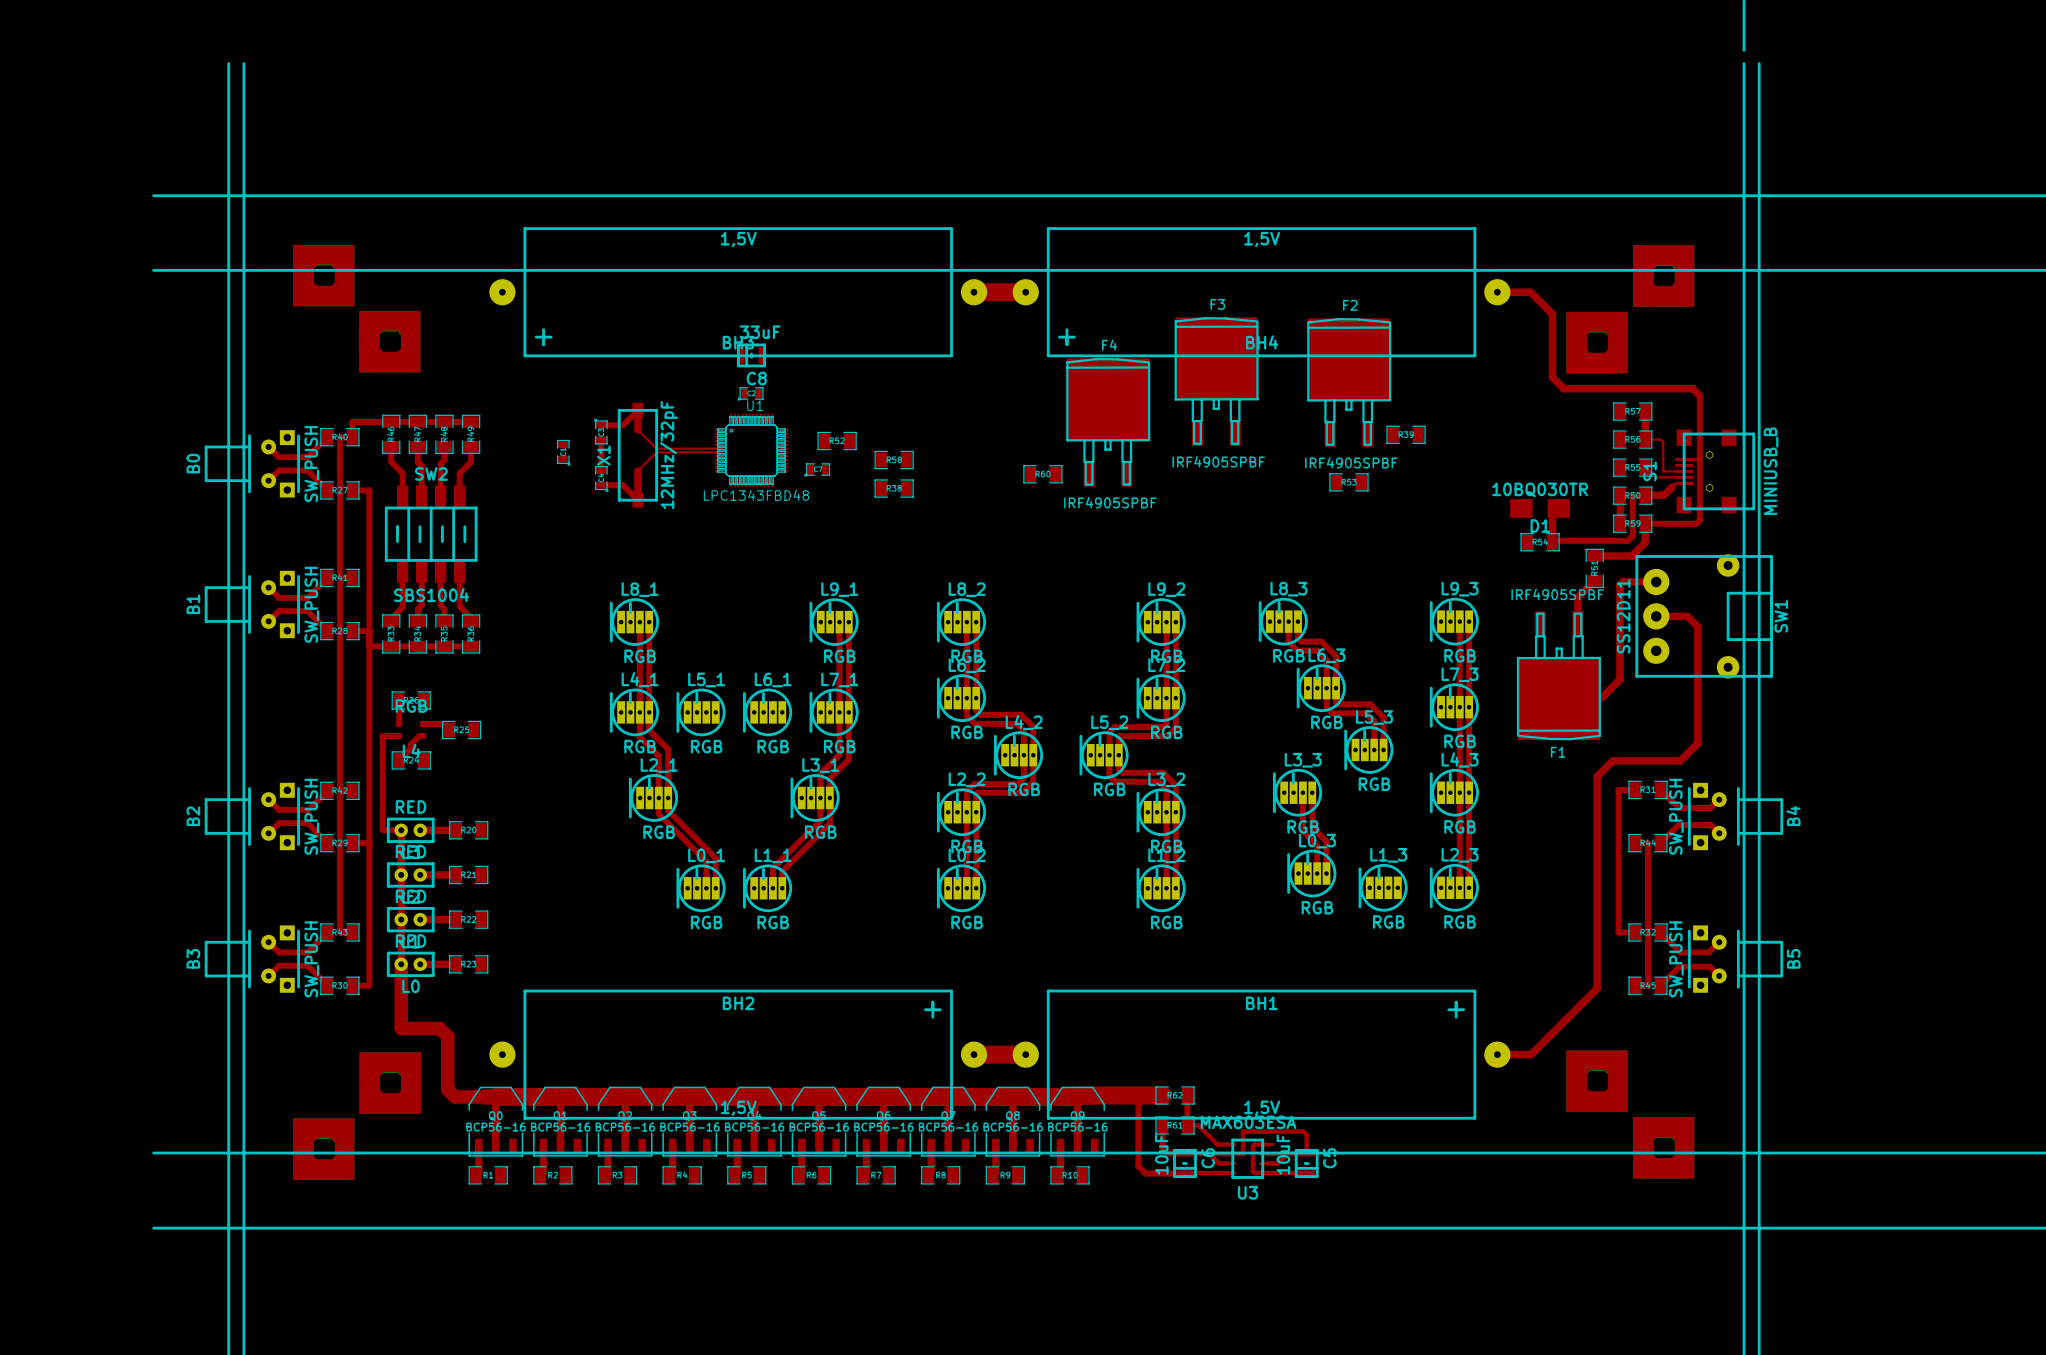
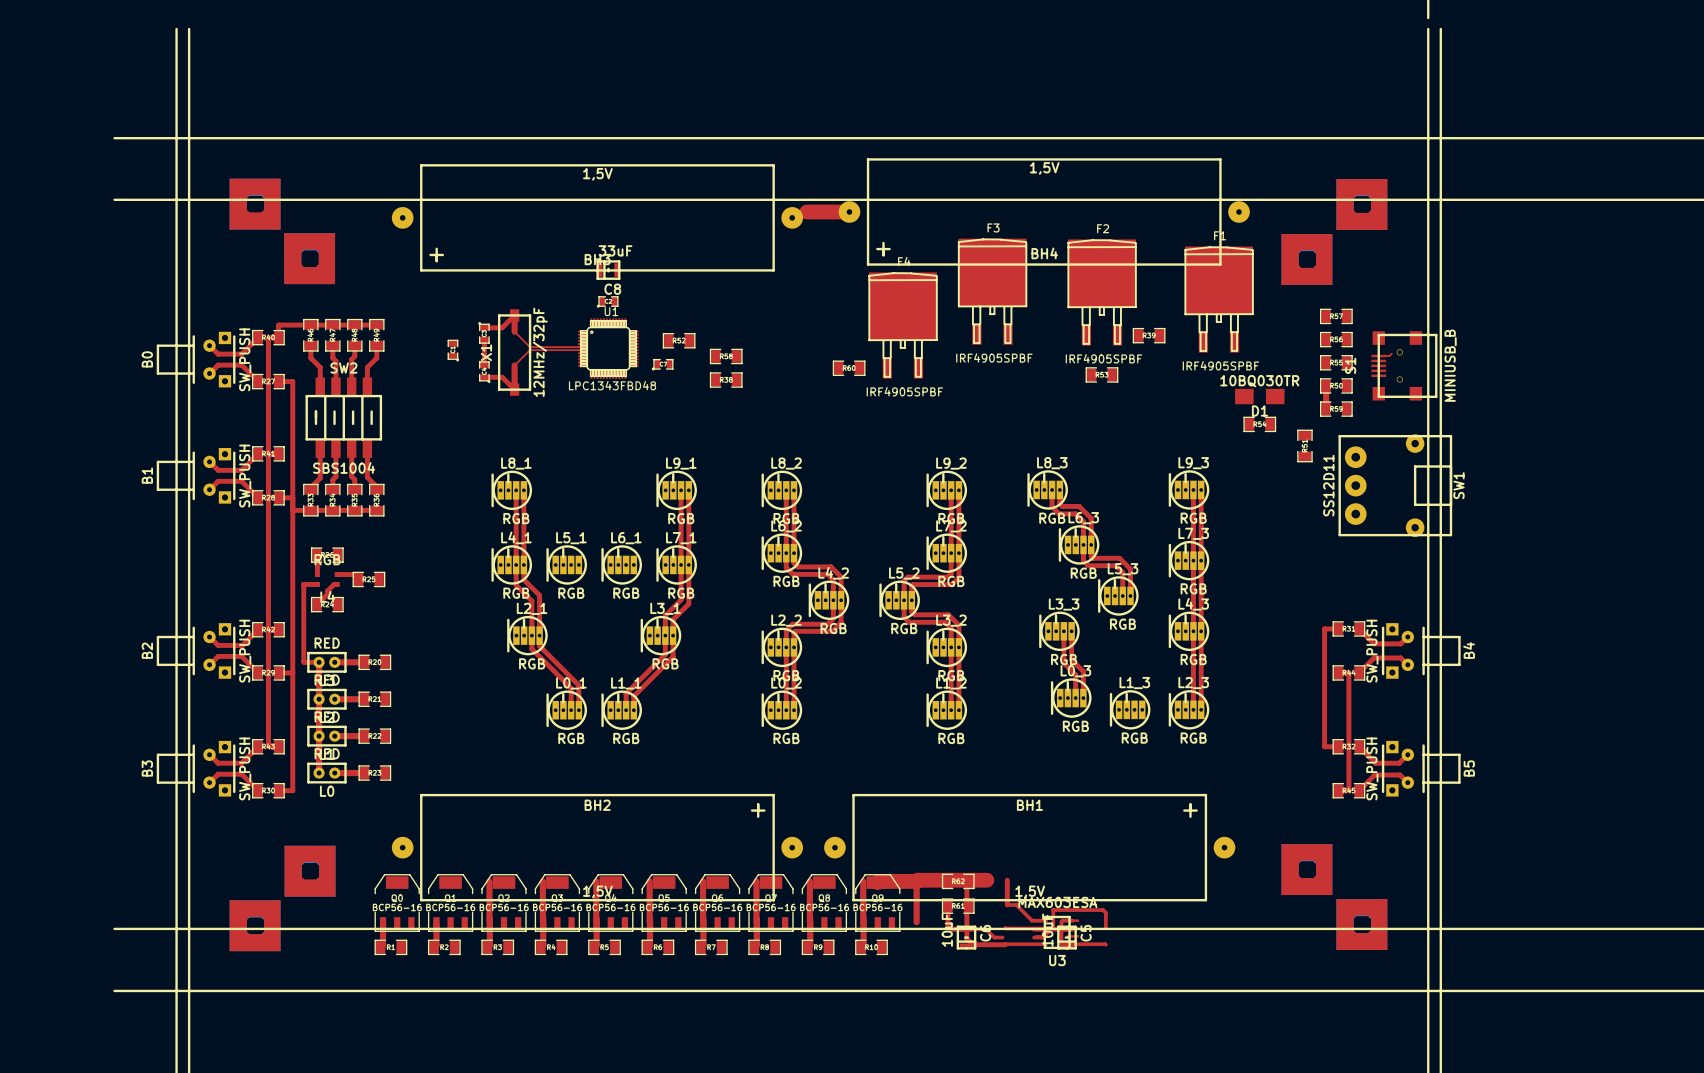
top track: (974, 292) (1025, 292) -> (806, 211) (849, 211)
BH4 position: (1261, 292) -> (1044, 211)
top track: (1497, 292) (1530, 292) (1552, 314) (1552, 377) (1563, 388) (1692, 388) (1699, 395) (1699, 520) (1696, 523) (1645, 523) (1645, 542) (1631, 556) (1594, 556) -> none
top track: (1645, 411) (1645, 439) (1660, 439) (1663, 442) (1663, 470) (1684, 471) -> none
top track: (1645, 467) (1654, 477) (1684, 477) -> none
top track: (1684, 483) (1675, 483) (1664, 495) (1632, 495) (1632, 536) (1628, 540) (1552, 542) (1552, 514) (1558, 508) -> none
top track: (1594, 580) (1577, 597) (1577, 623) -> none
top track: (1656, 581) (1623, 581) (1619, 585) (1619, 679) (1600, 698) (1559, 698) -> none
top track: (1656, 616) (1687, 616) (1697, 626) (1697, 743) (1680, 760) (1612, 760) (1597, 776) (1597, 988) (1531, 1054) (1497, 1054) -> none
F1 rotation: 0° (1558, 675) -> 180° (1219, 299)
F1 position: (1558, 675) -> (1219, 299)
top track: (401, 964) (401, 1028) (439, 1028) (447, 1036) (447, 1089) (454, 1096) (495, 1096) -> none
top track: (974, 1054) (1025, 1054) -> none
top track: (1124, 1095) (1162, 1095) (1142, 1095) (1138, 1099) (1138, 1166) (1145, 1173) (1228, 1172) -> none
top track: (1187, 1095) (1187, 1125) (1198, 1125) (1217, 1144) (1228, 1144) -> (1007, 880) (1007, 904) (1016, 904) (1032, 920) (1041, 920)
top track: (495, 1096) (495, 1146) -> (542, 881) (542, 922)
top track: (495, 1096) (1077, 1096) (1077, 1146) -> none
top track: (560, 1096) (560, 1146) -> (489, 881) (489, 922)
top track: (625, 1096) (625, 1146) -> none
top track: (689, 1096) (689, 1146) -> (596, 881) (596, 922)
top track: (754, 1096) (754, 1146) -> (649, 881) (649, 922)
top track: (819, 1096) (819, 1146) -> (703, 881) (703, 922)
top track: (883, 1096) (883, 1146) -> (756, 881) (756, 922)
top track: (948, 1096) (948, 1146) -> (809, 881) (809, 922)
top track: (1012, 1096) (1012, 1146) -> (863, 881) (863, 922)
top track: none -> (916, 922) (917, 880) (986, 880) (970, 880) (966, 883) (966, 938) (972, 944) (1041, 944)
top track: (1266, 1144) (1252, 1145) (1254, 1172) (1306, 1173) -> (1072, 920) (1061, 921) (1062, 944) (1105, 944)
top track: (1185, 1153) (1243, 1153) (1243, 1131) (1303, 1131) (1306, 1134) (1306, 1153) -> (1005, 928) (1053, 928) (1053, 910) (1103, 910) (1105, 912) (1105, 928)
U3 position: (1247, 1158) -> (1057, 932)

